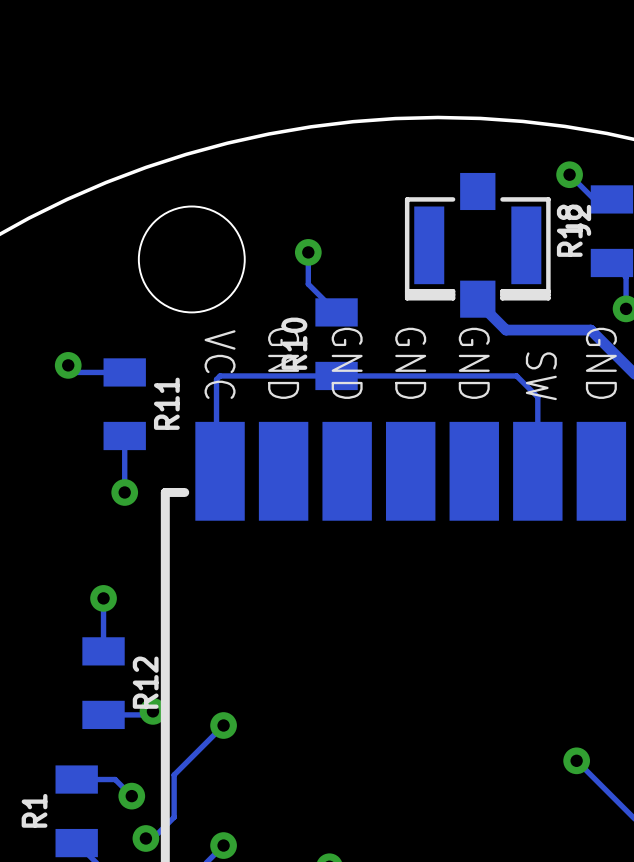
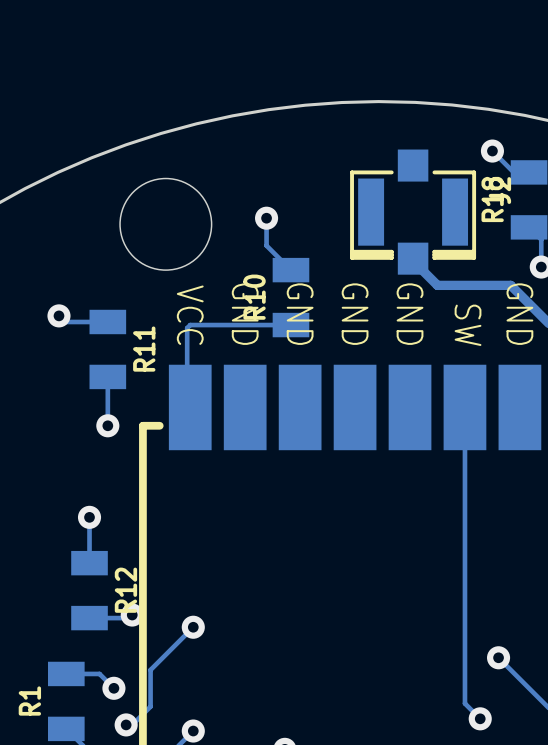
track: (336, 375) (516, 375) (537, 397) (537, 471) -> (480, 718) (464, 703) (464, 407)
via: none -> (480, 718)

